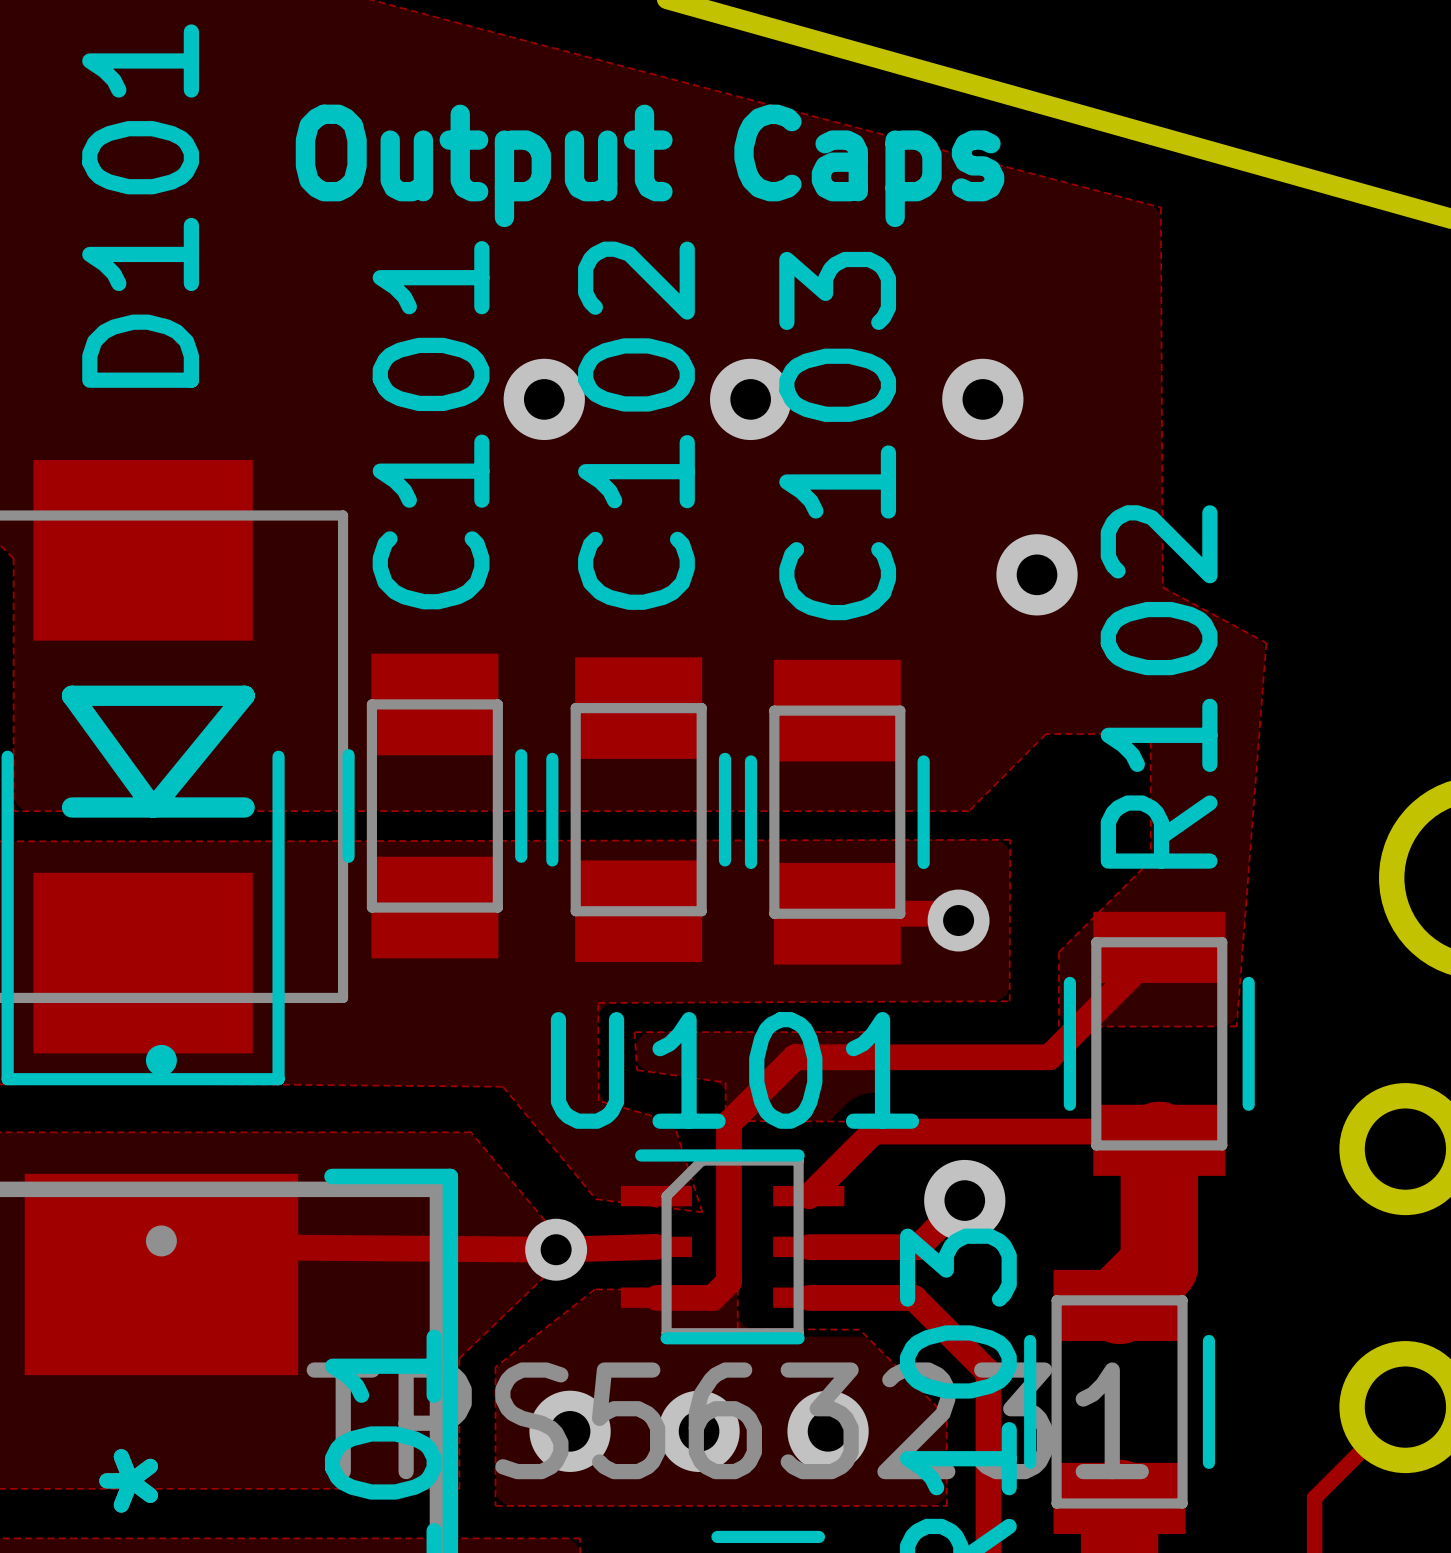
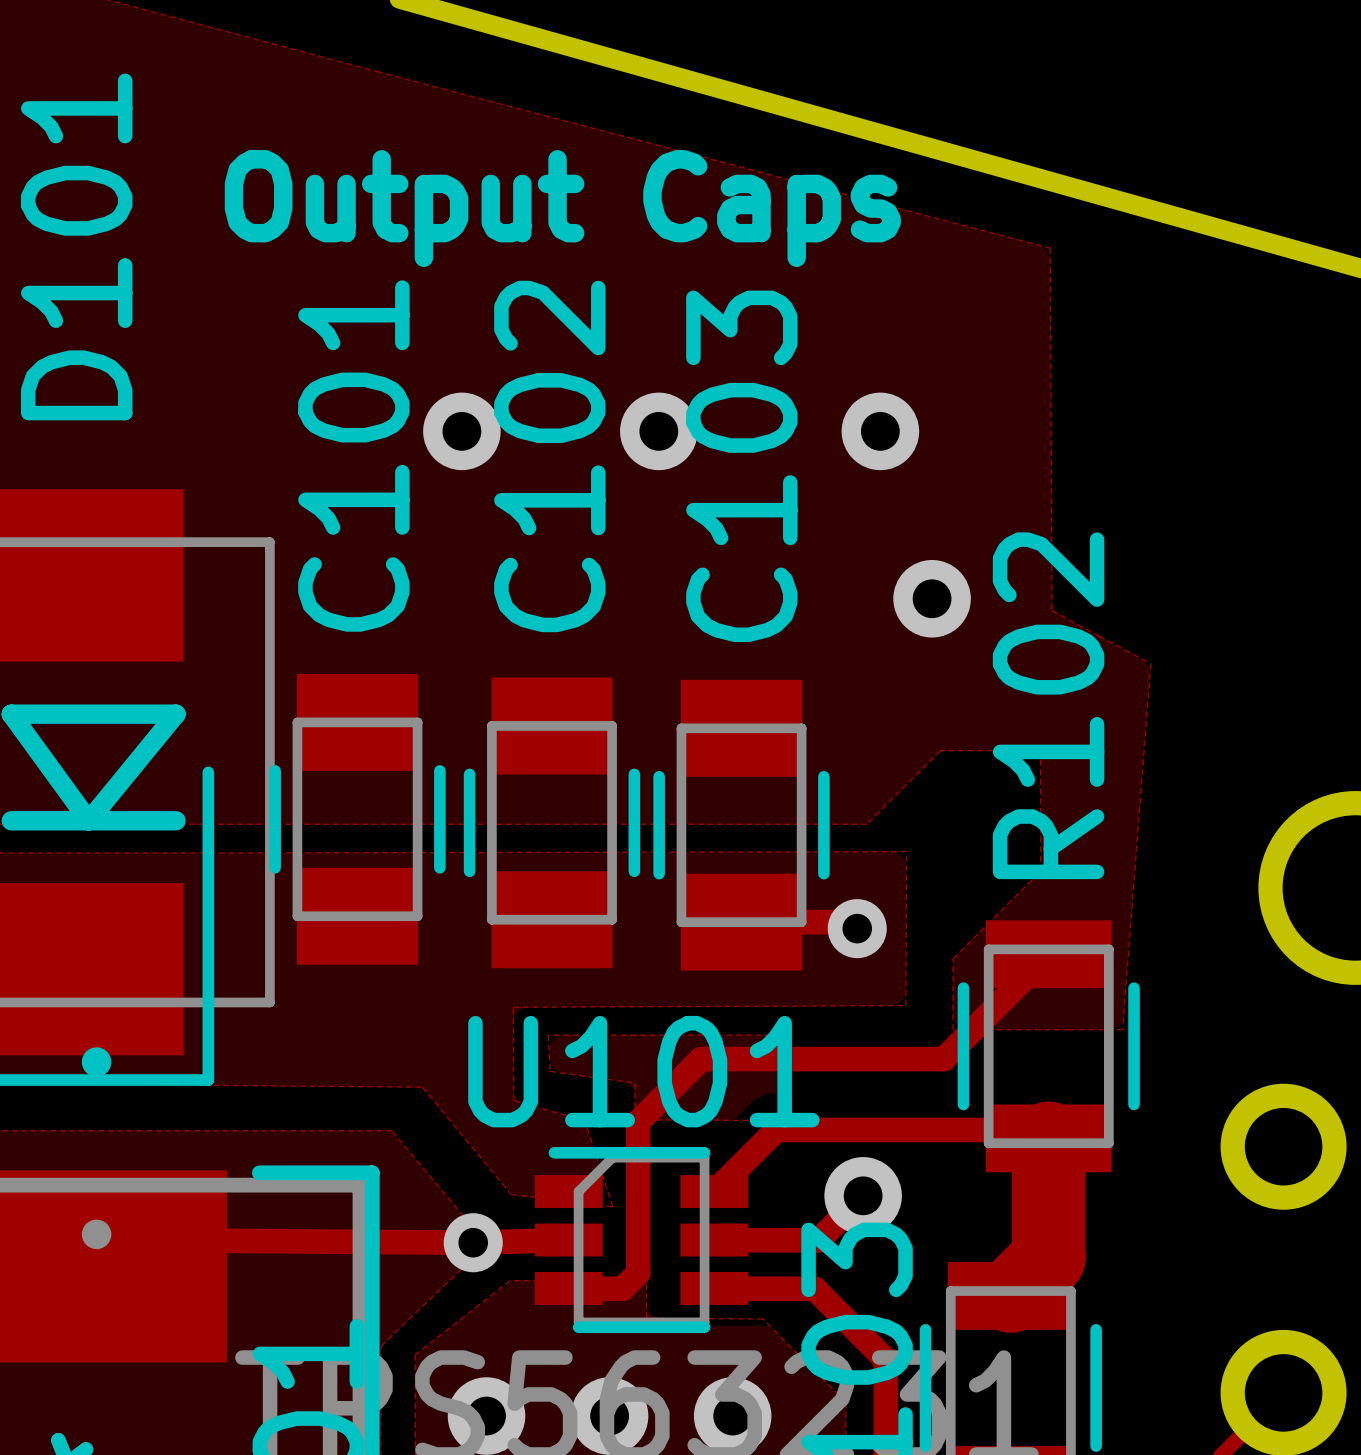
U101 footprint: [620, 1149, 845, 1345] -> [534, 1146, 749, 1334]

